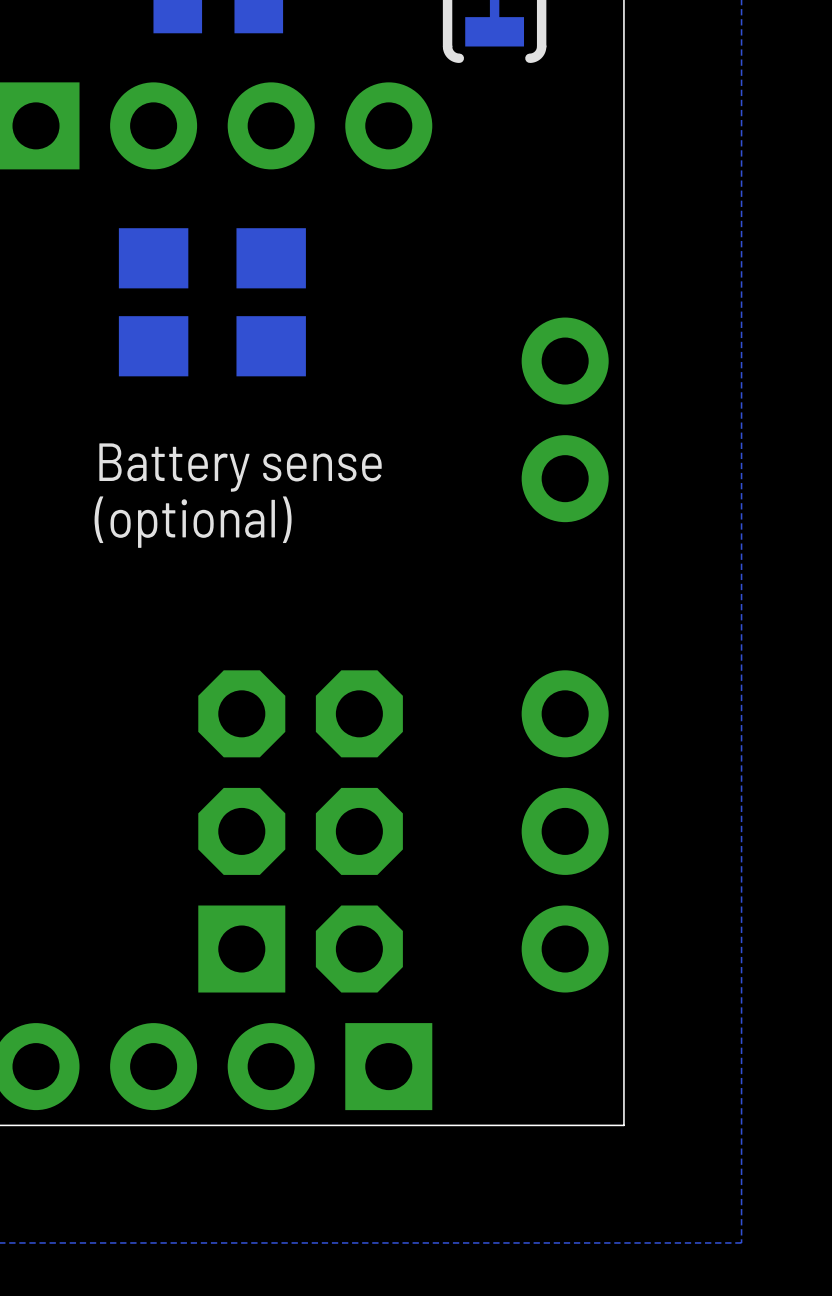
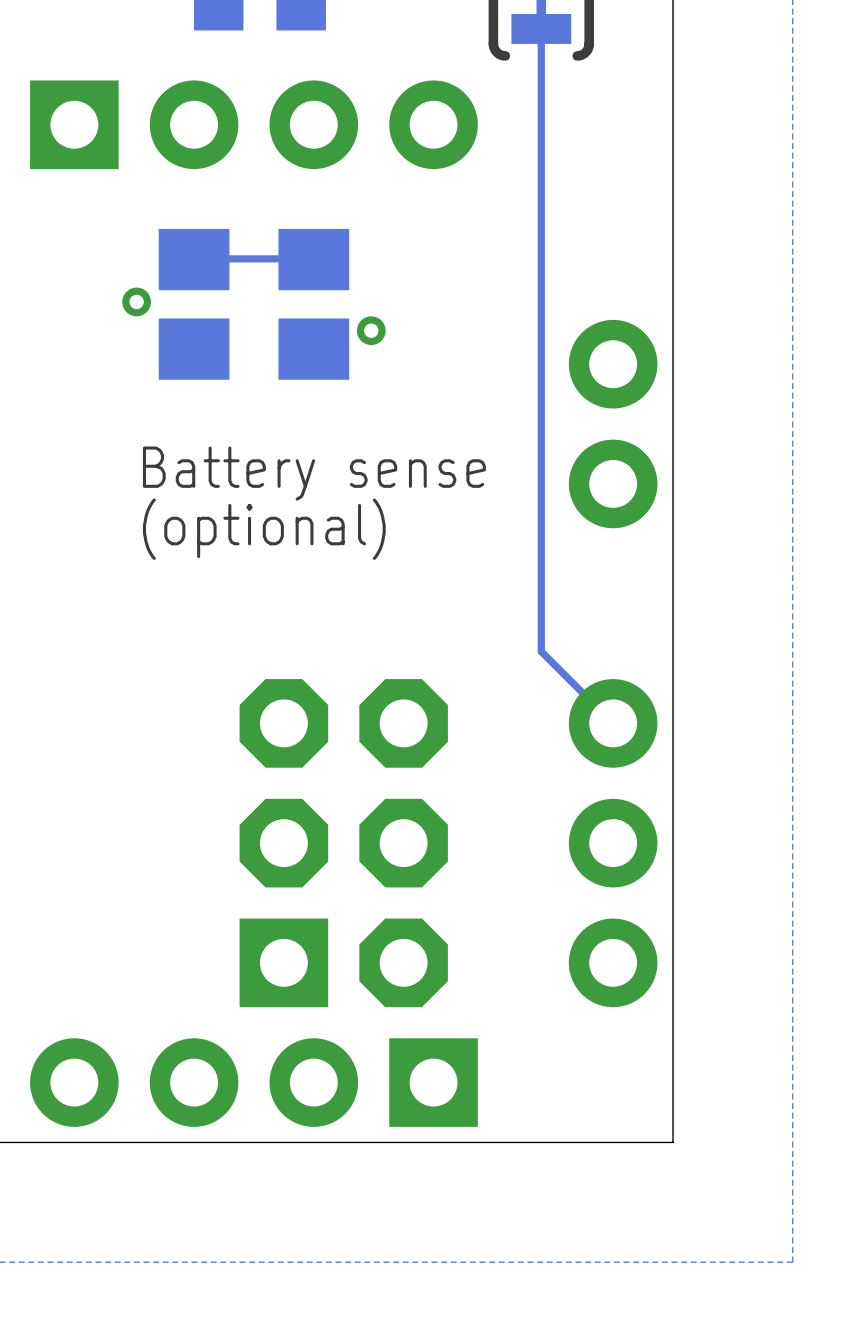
track: none -> (541, 28) (541, 651) (613, 723)
track: none -> (313, 258) (194, 258)
via: none -> (136, 301)
via: none -> (371, 330)

